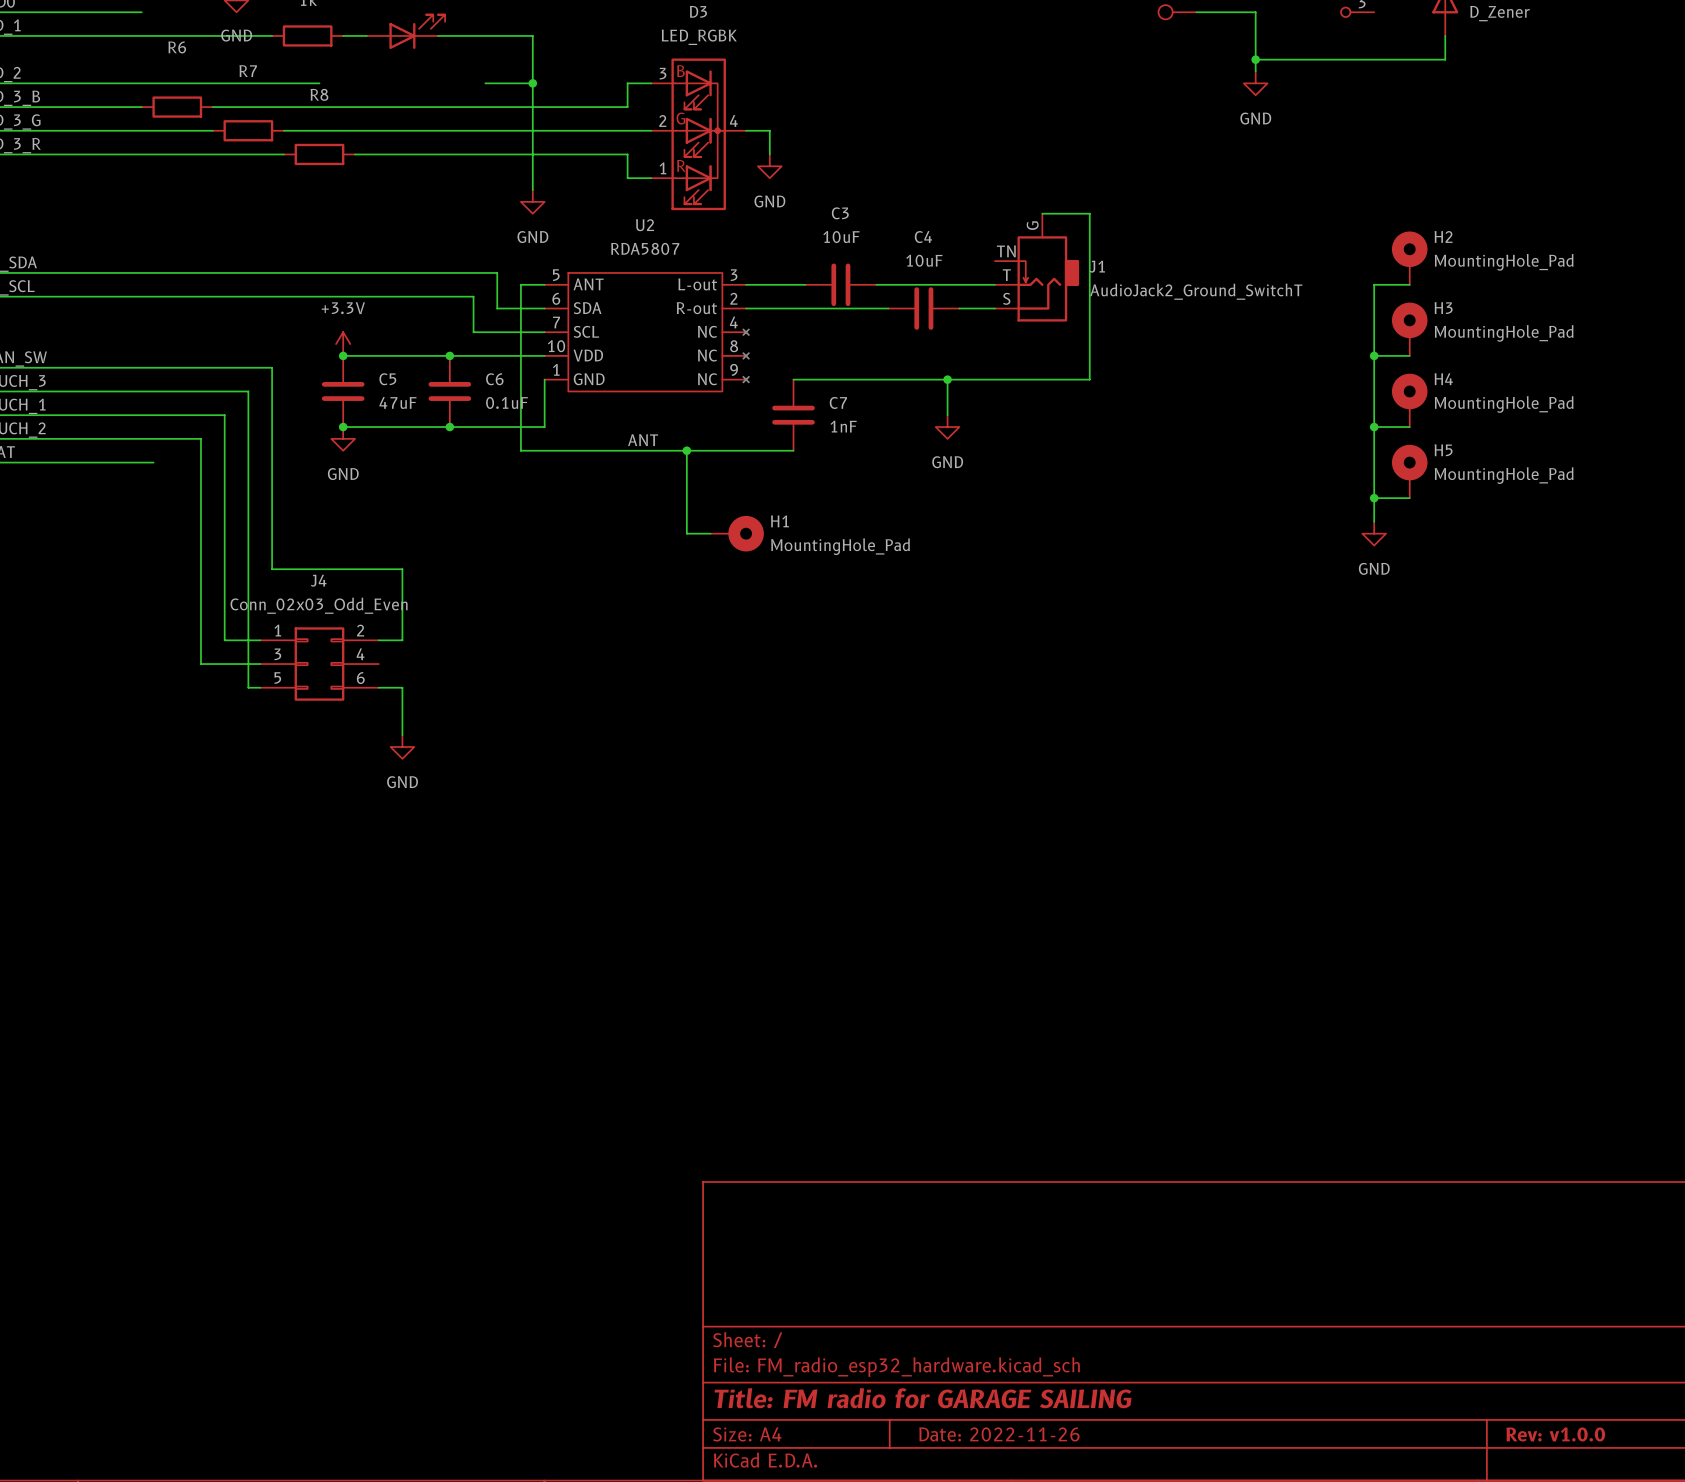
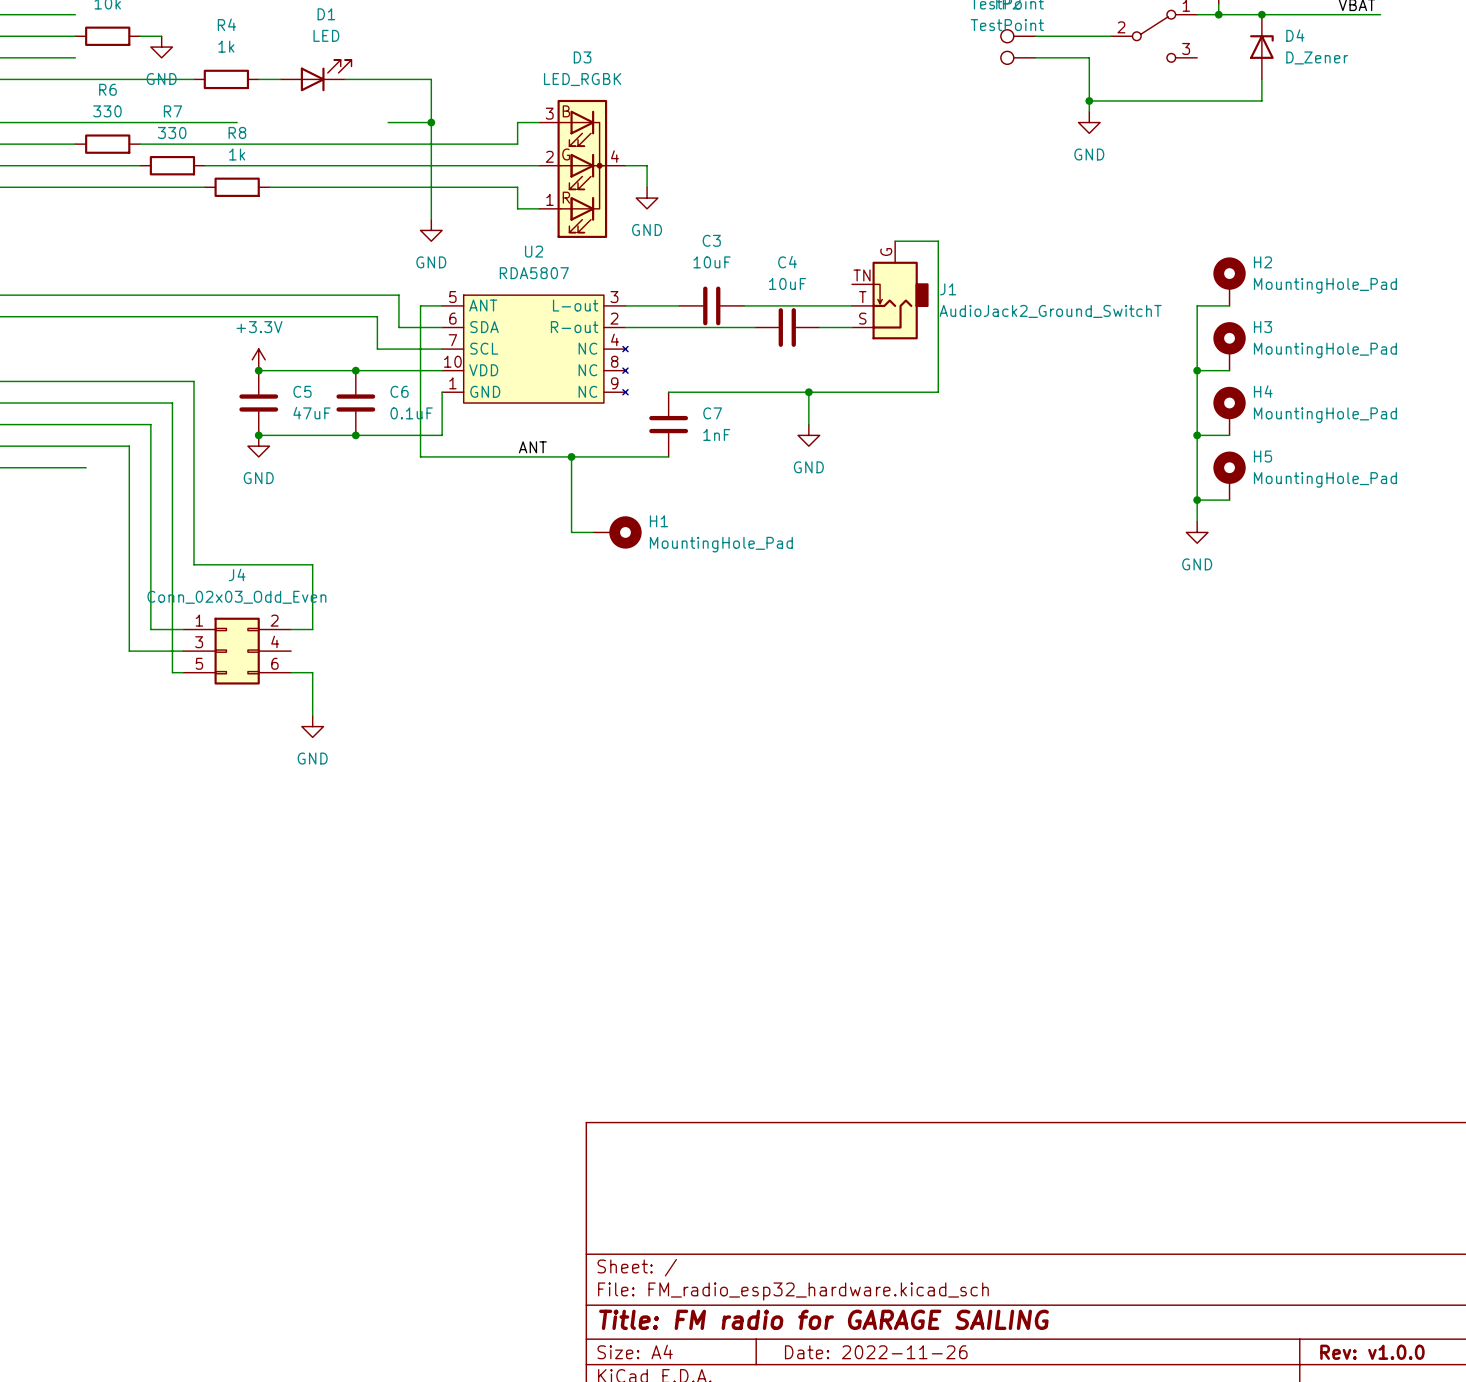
R6 value: none -> 330 (107, 111)
R7 value: none -> 330 (172, 132)
R8 value: none -> 1k (237, 154)

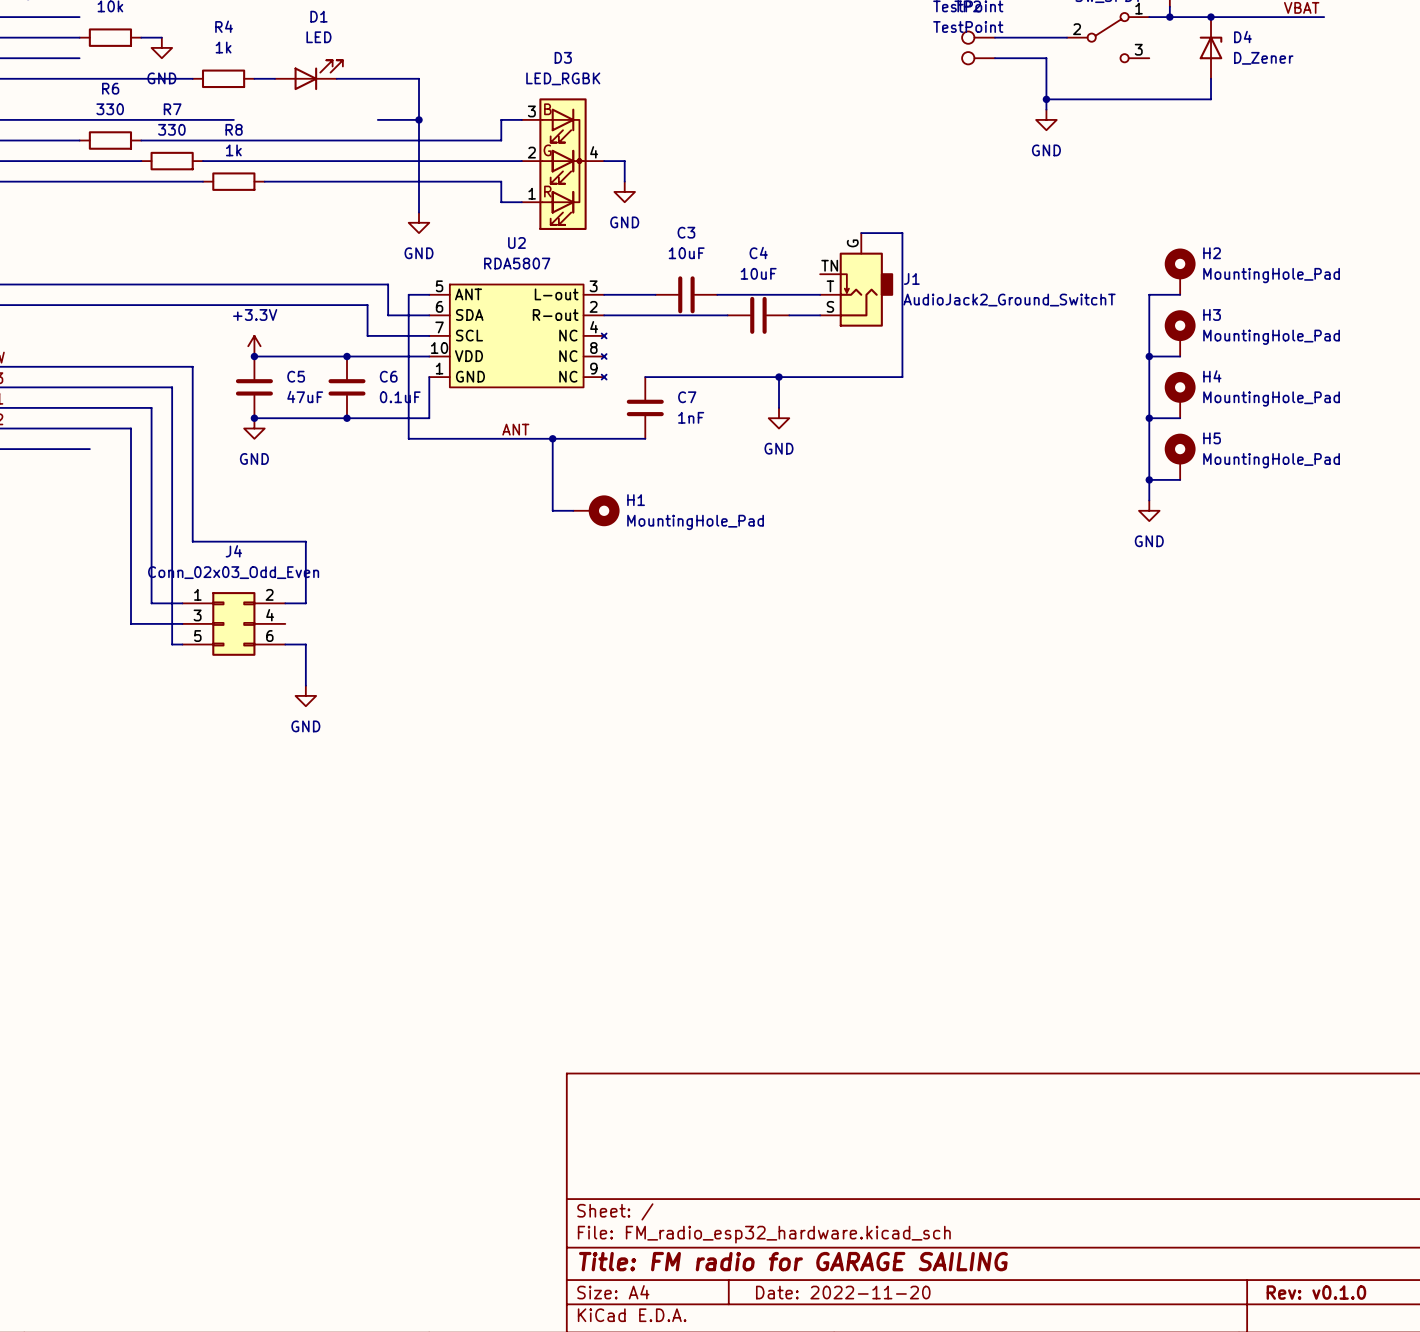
title block: Date: 2022-11-26 (876, 1352) -> Date: 2022-11-20 (843, 1292)
title block: Rev: v1.0.0 (1372, 1352) -> Rev: v0.1.0 (1316, 1292)

